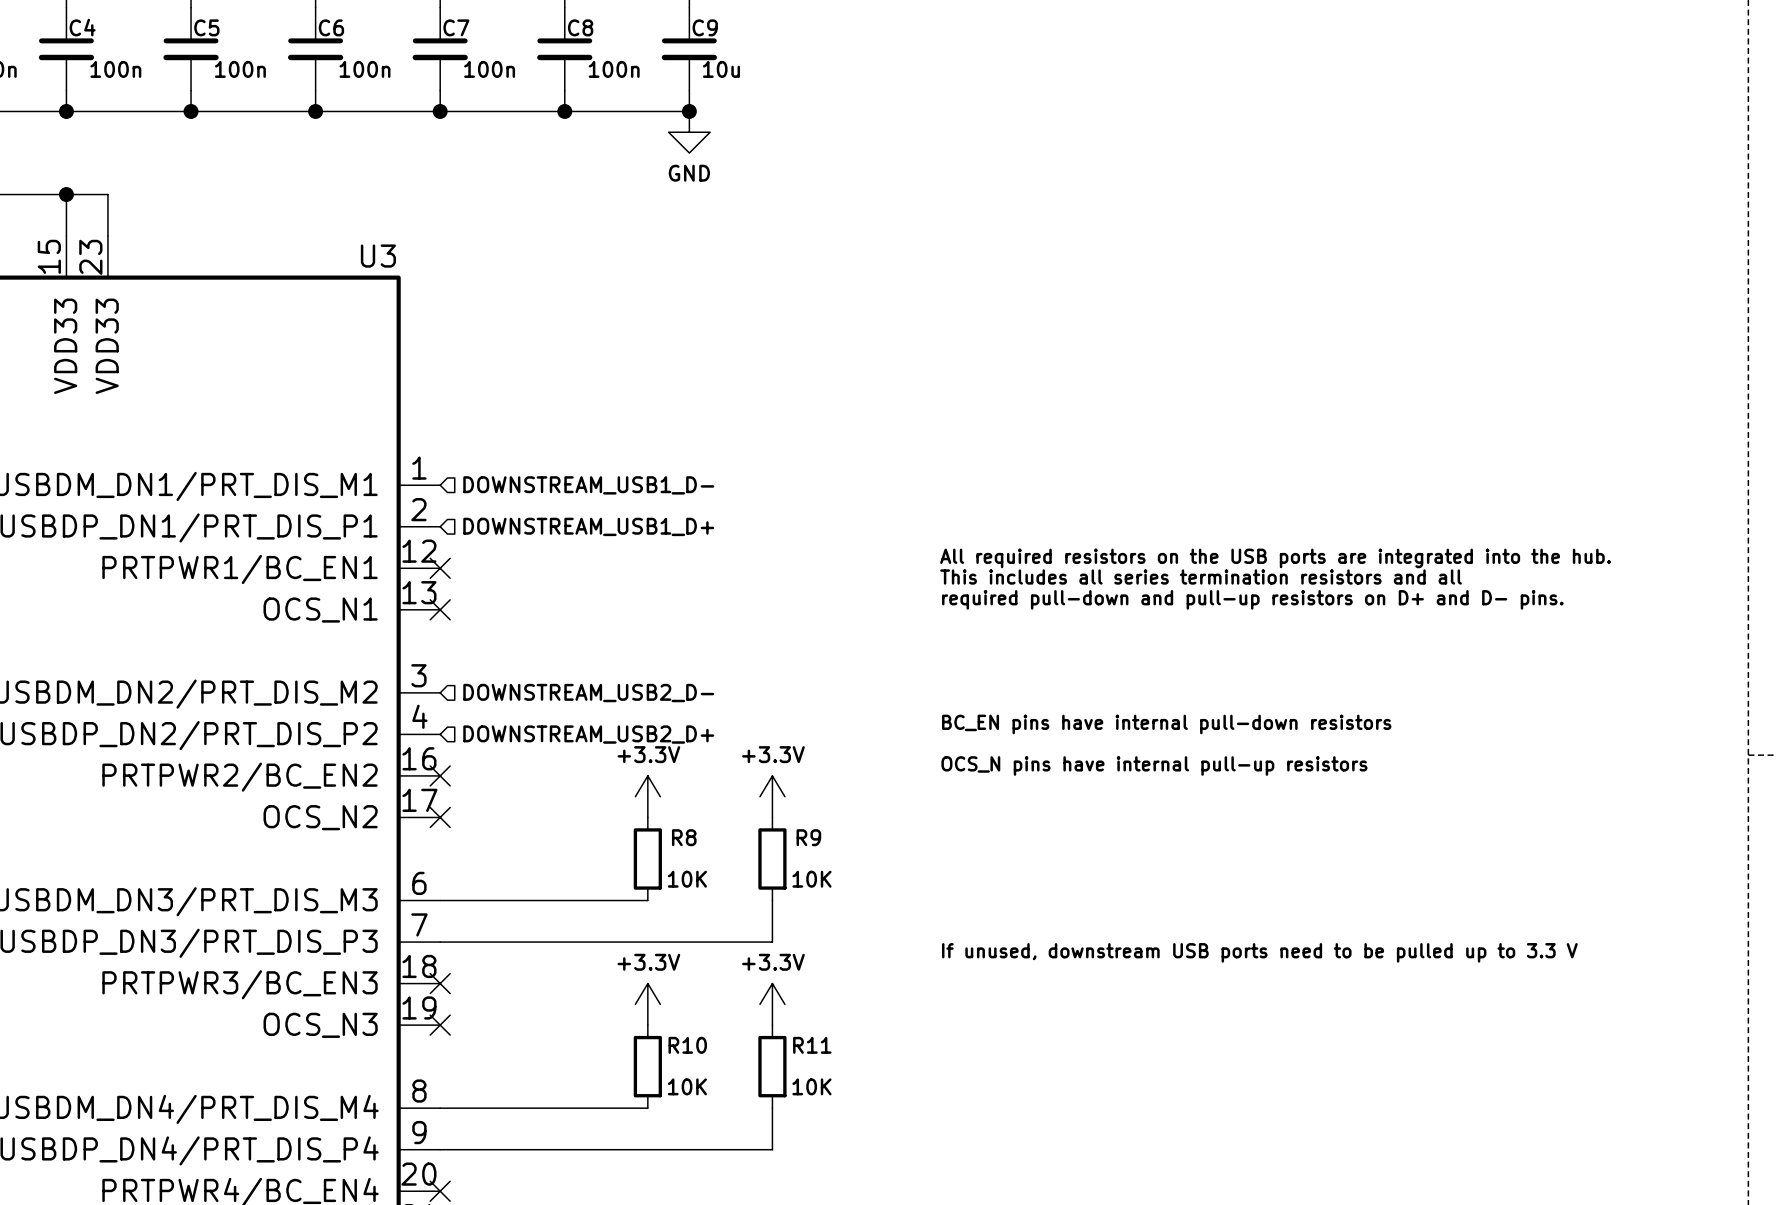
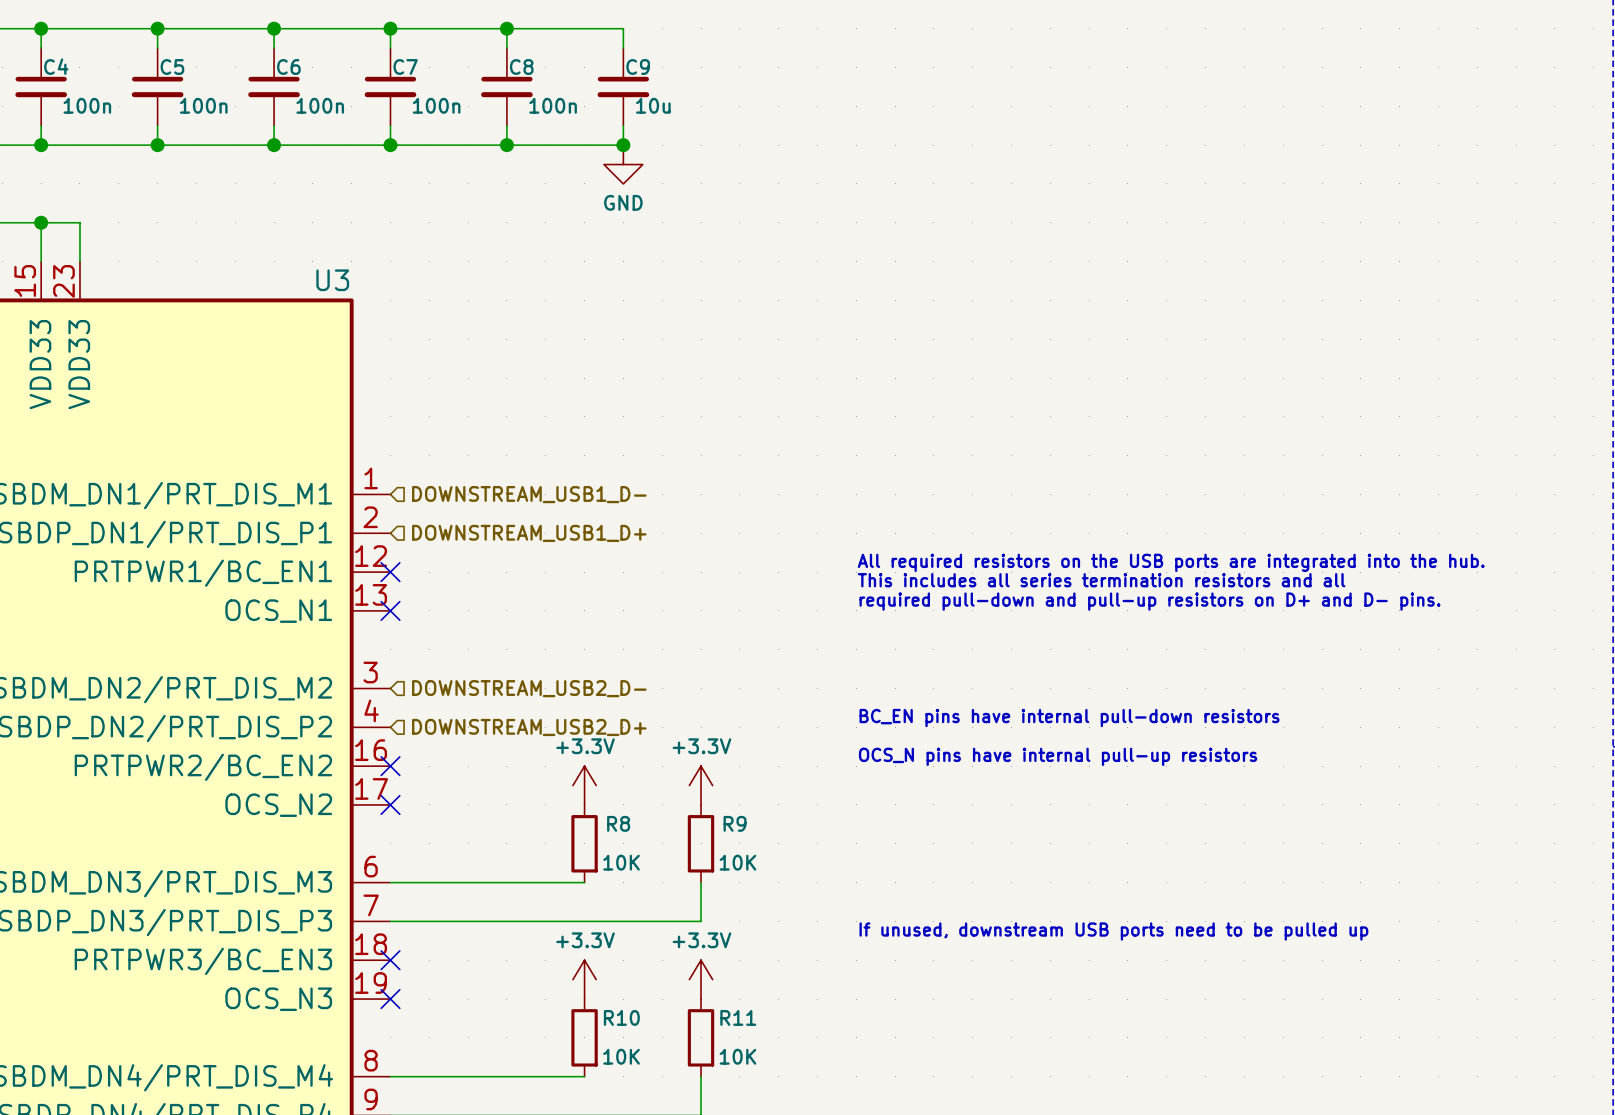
text: If unused, downstream USB ports need to be pulled up to 3.3 V (1259, 952) -> If unused, downstream USB ports need to be pulled up (1113, 931)

